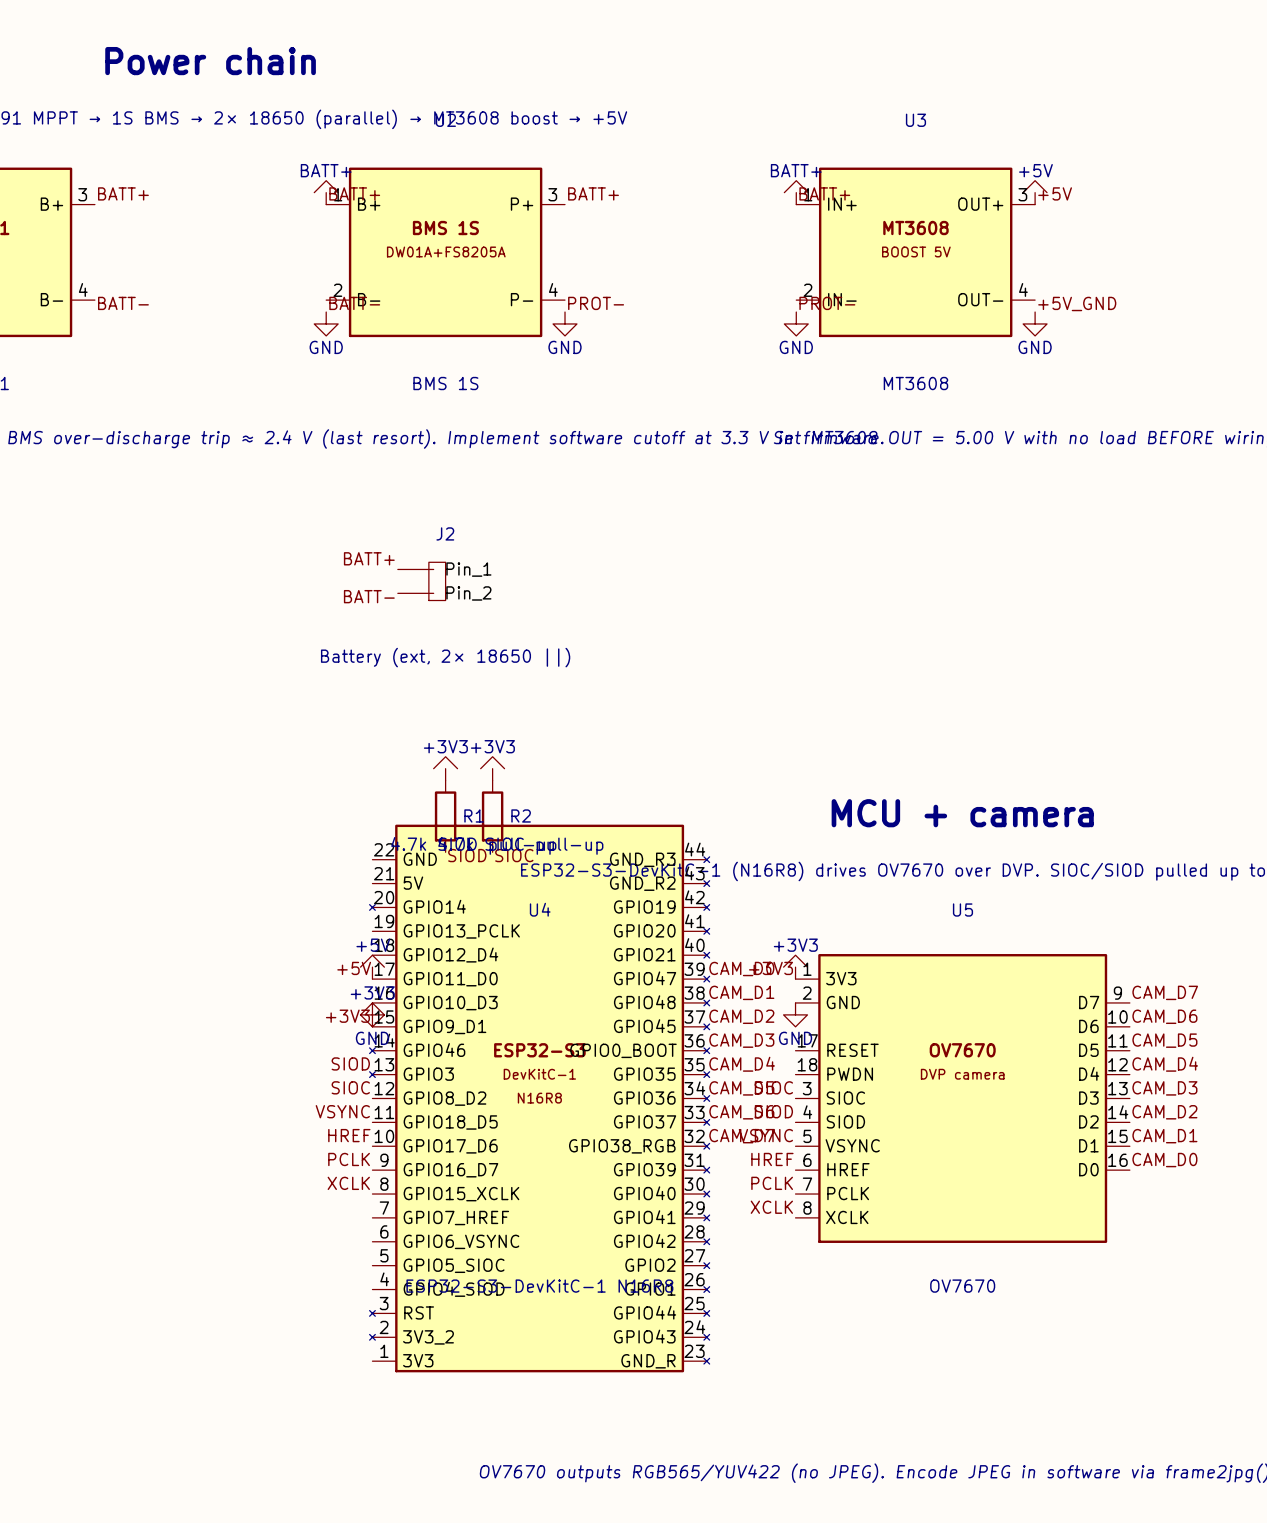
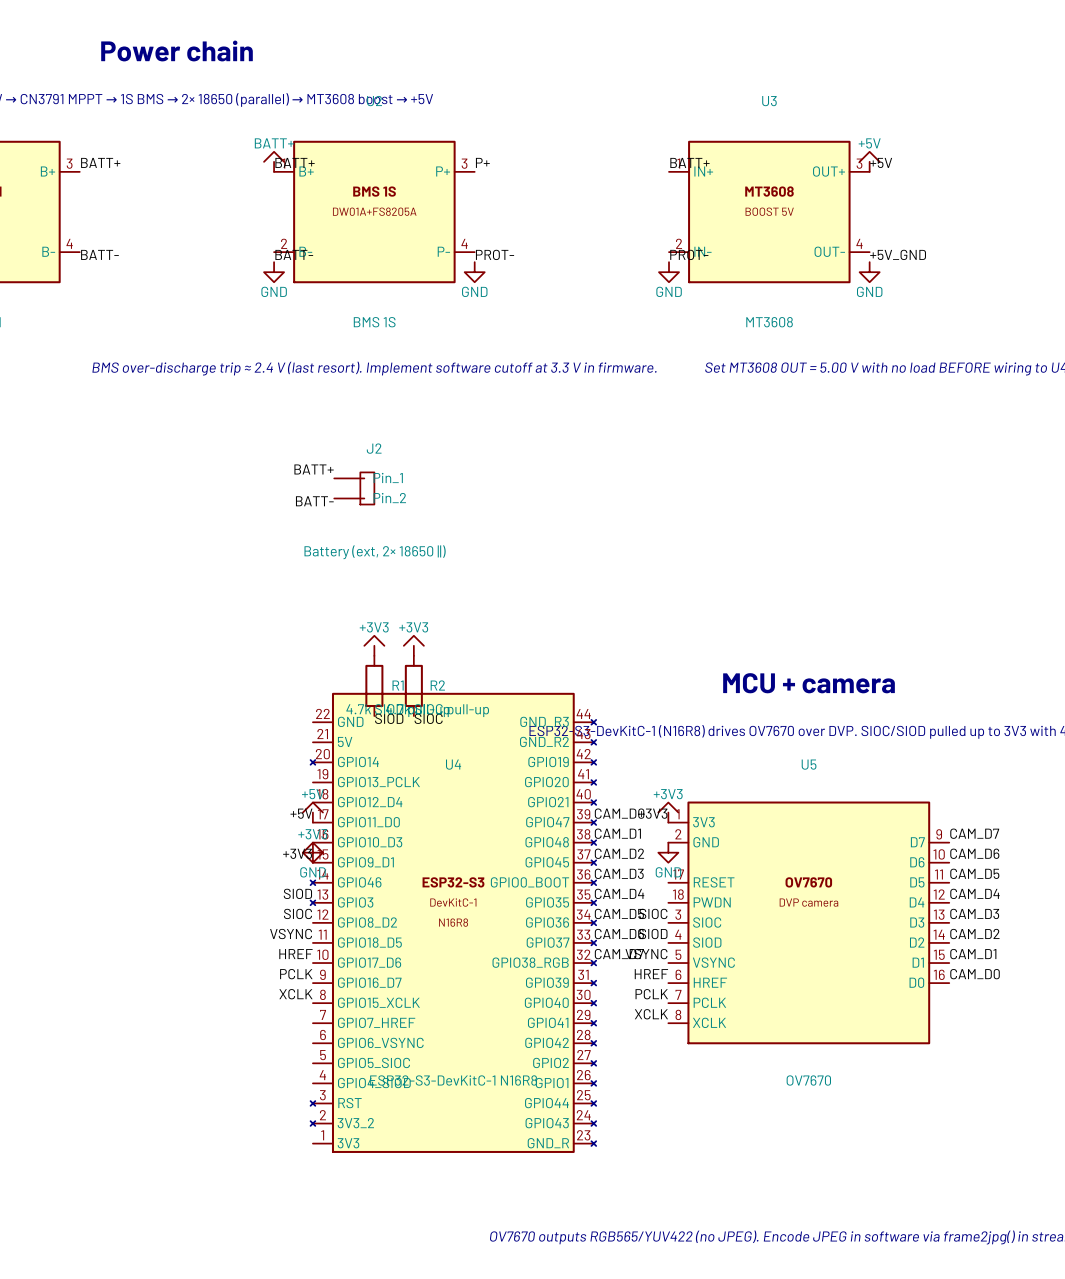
power symbol: BATT+ (796, 192) -> none
label: BATT+ (593, 193) -> P+ (482, 162)

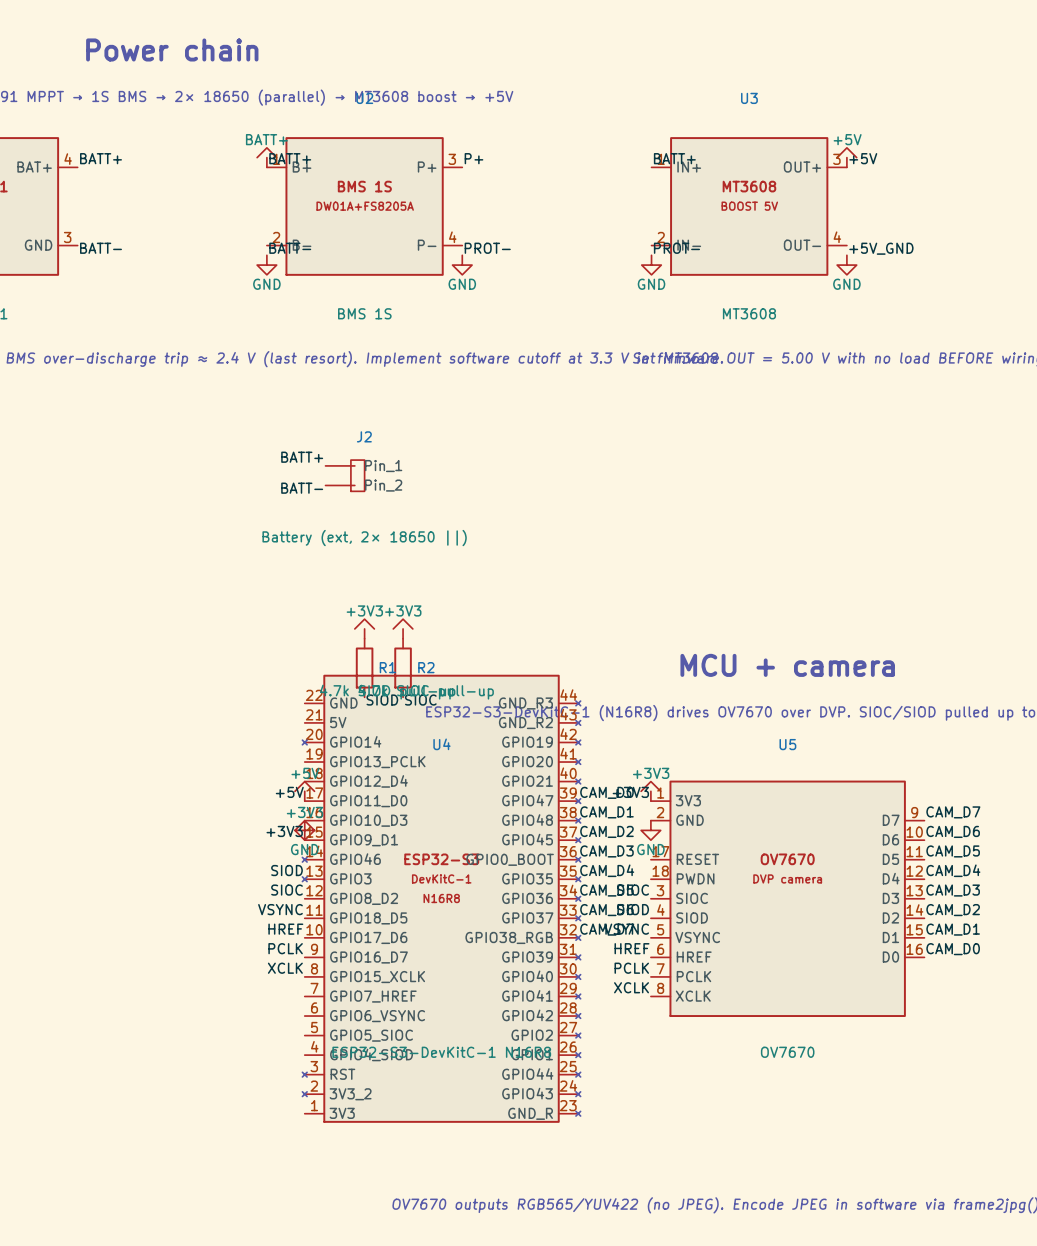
part pin number: 3 (69, 163) -> 4 (68, 159)
part pin name: B+ (47, 171) -> BAT+ (34, 167)
part pin number: 4 (69, 243) -> 3 (67, 237)
part pin name: B- (48, 251) -> GND (38, 245)

